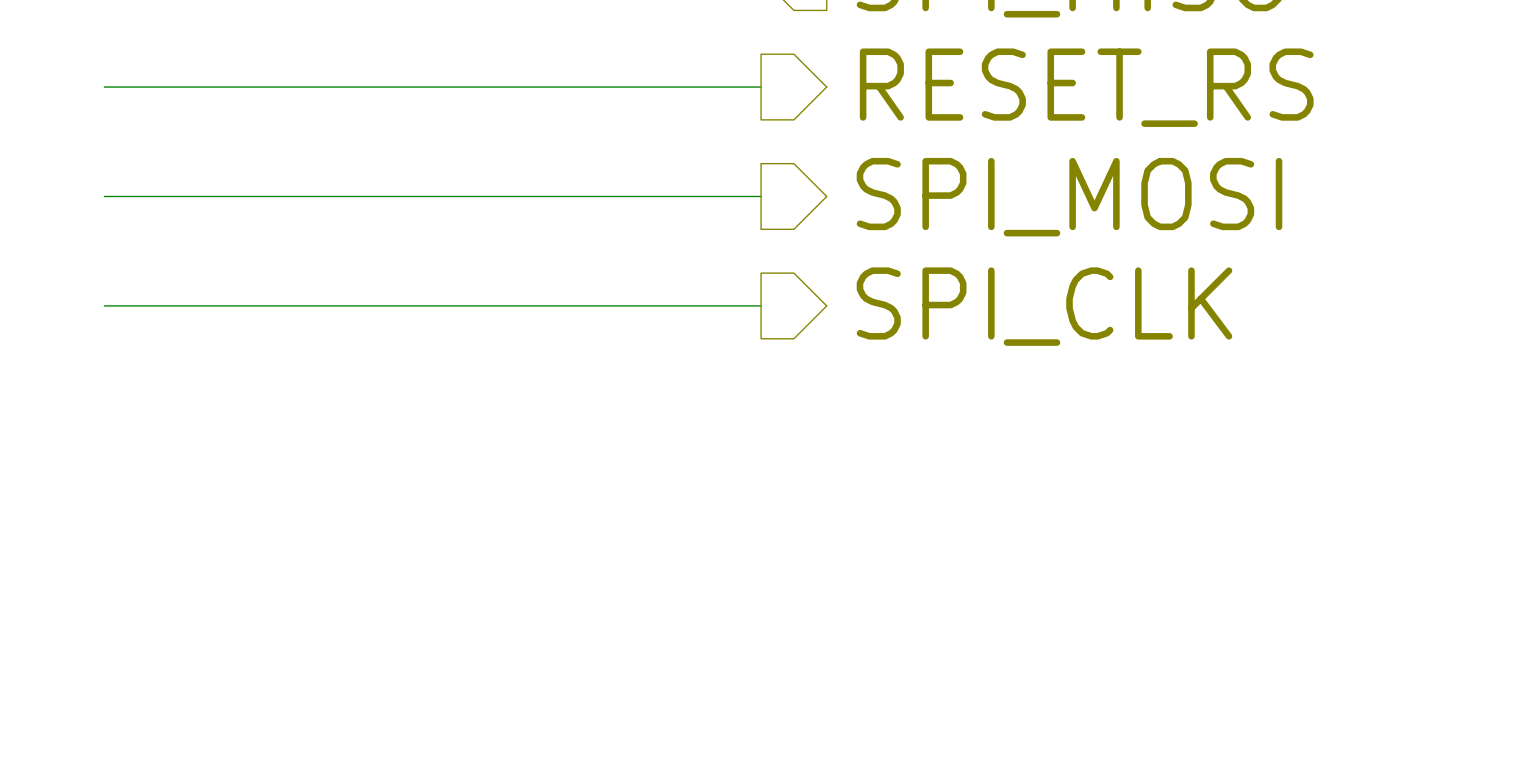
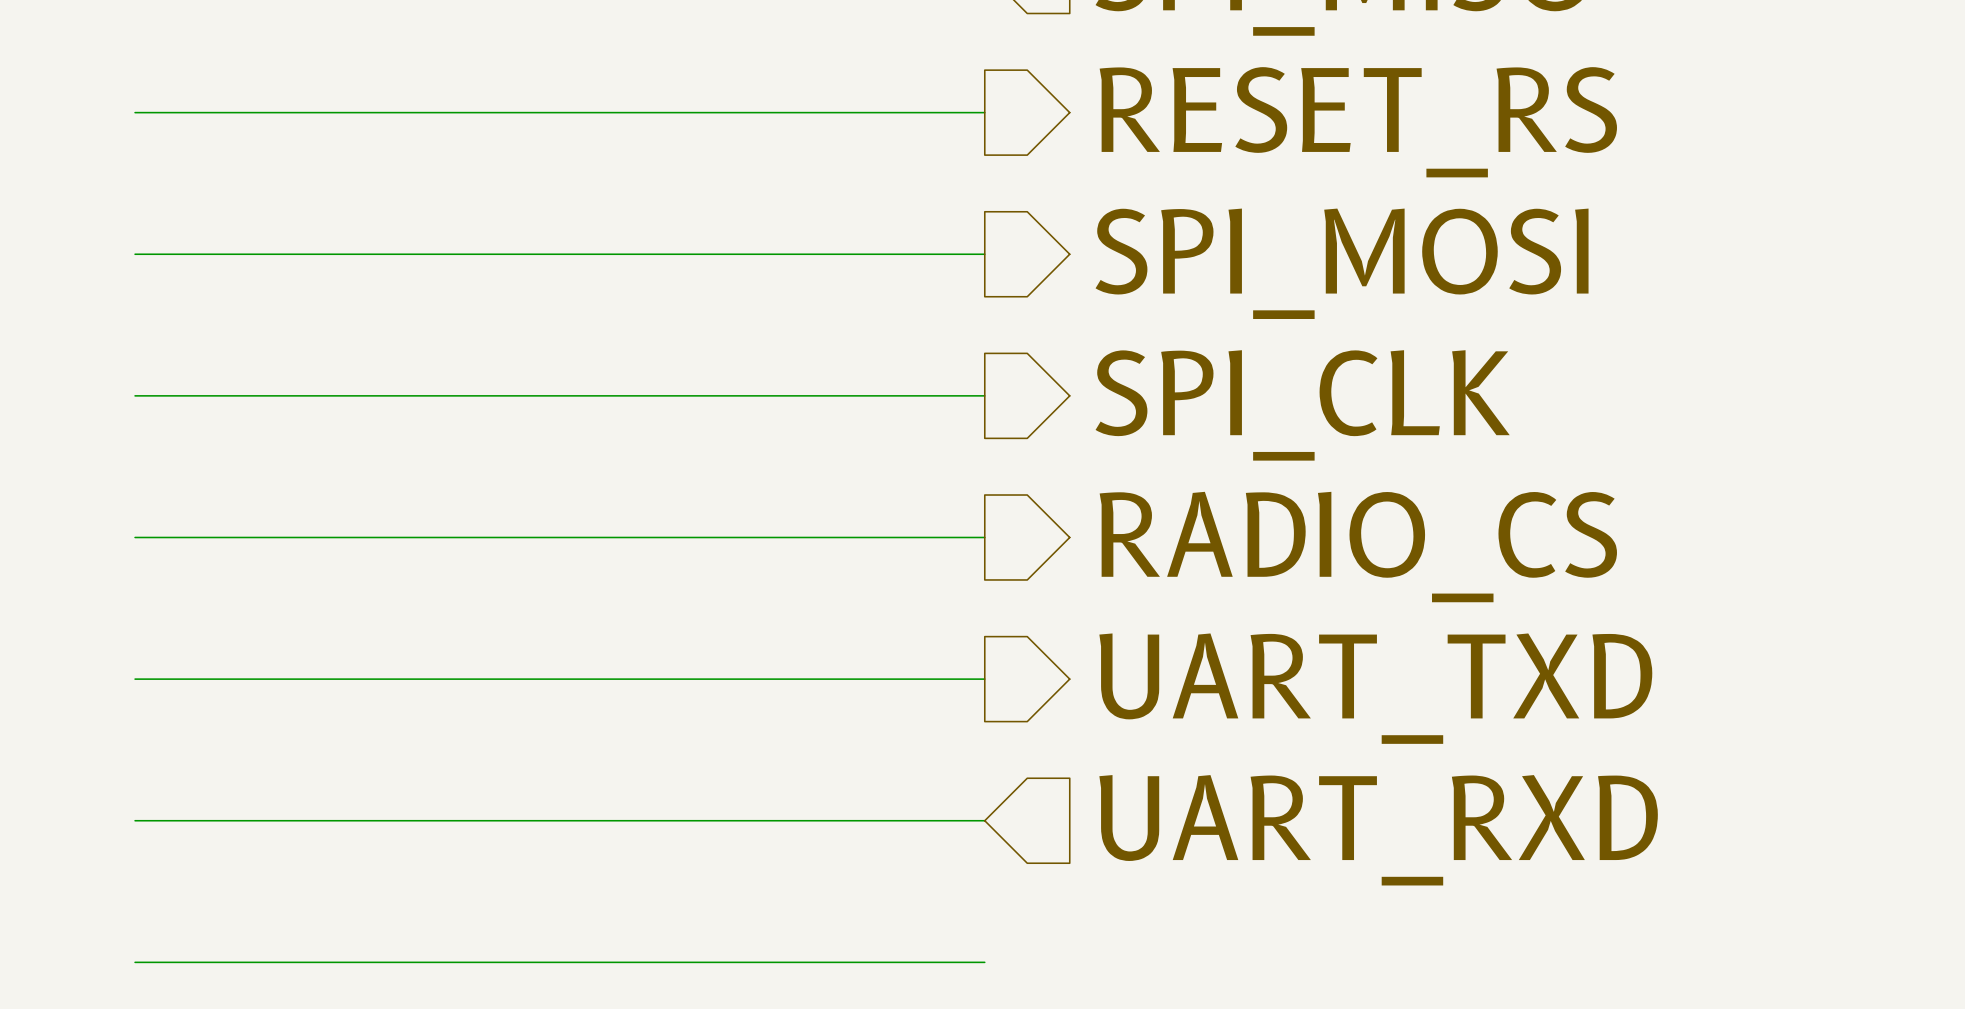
wire: none -> (135, 537) (984, 537)
hierarchical label: none -> RADIO_CS (1358, 547)
wire: none -> (135, 679) (984, 679)
hierarchical label: none -> UART_TXD (1375, 688)
wire: none -> (135, 820) (984, 820)
hierarchical label: none -> UART_RXD (1378, 830)
wire: none -> (135, 962) (984, 962)

